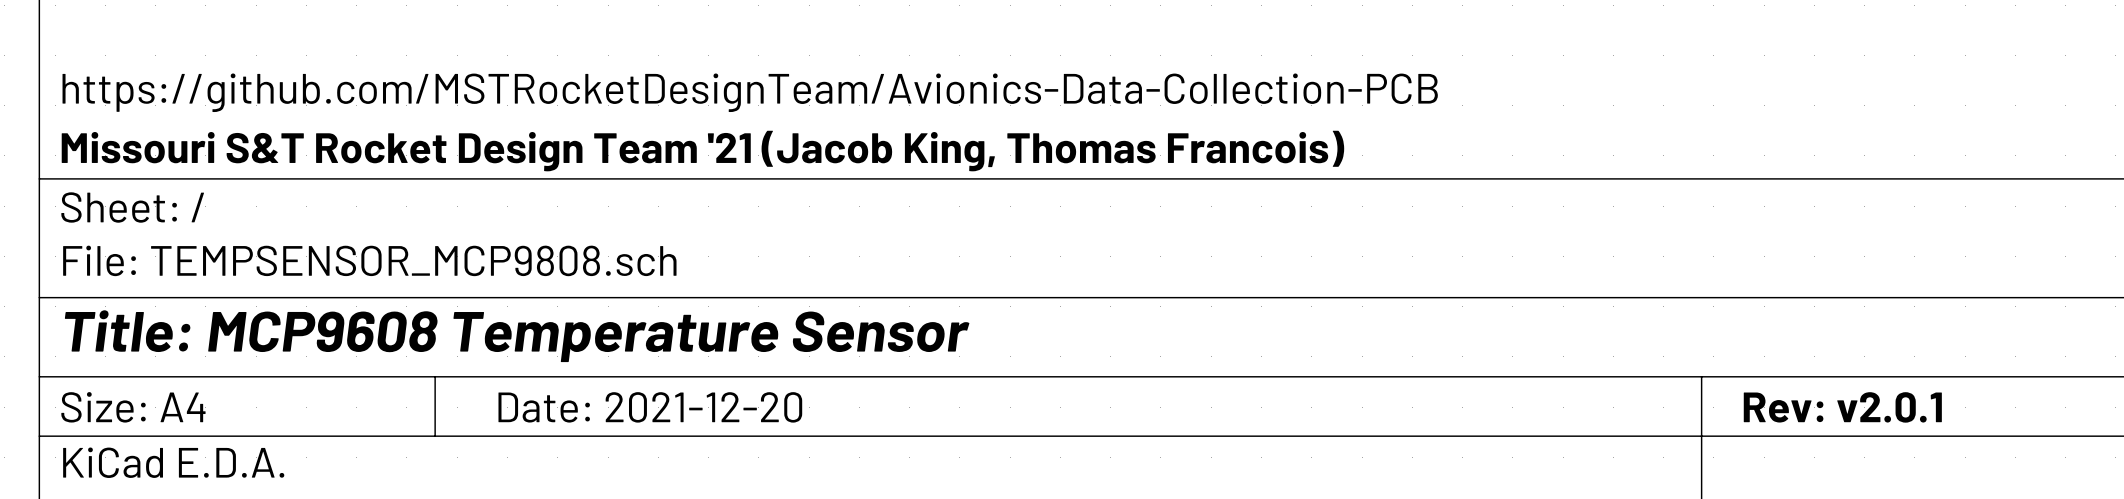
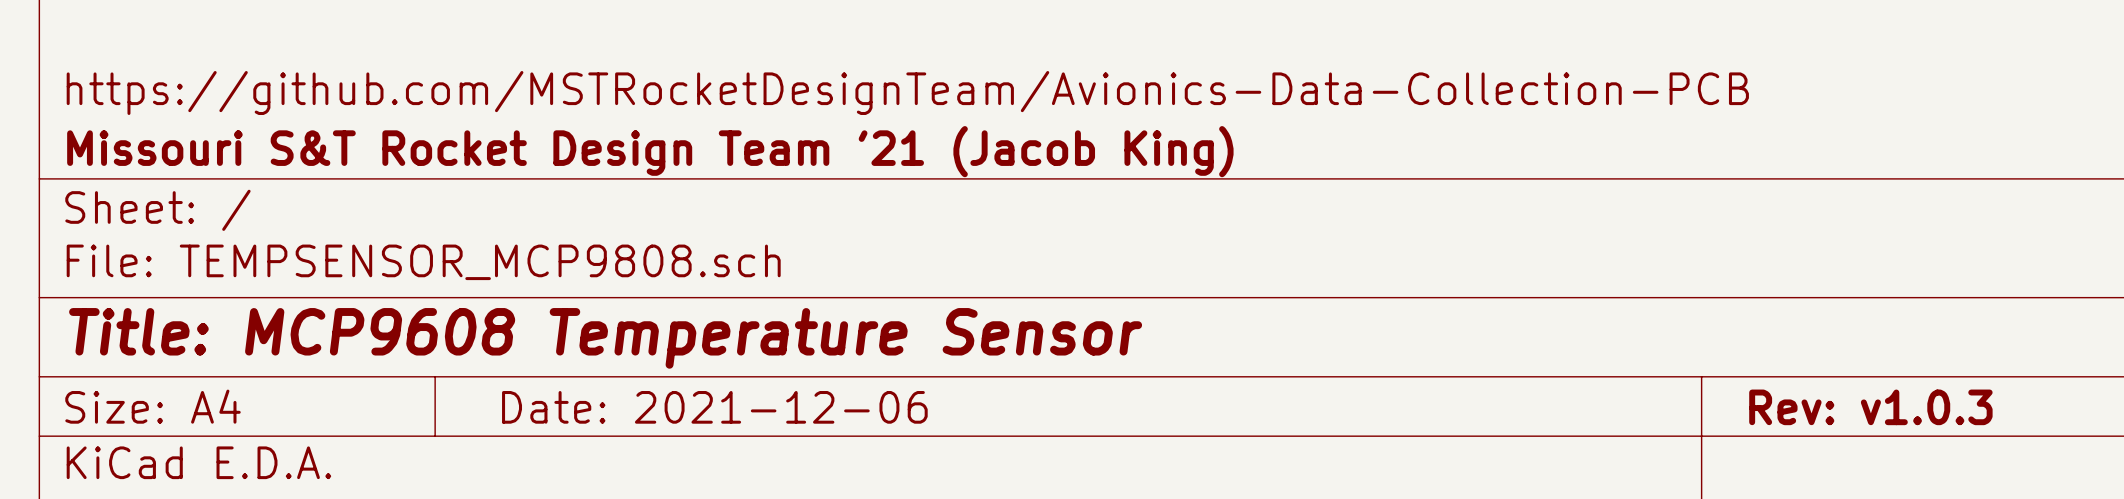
title block: Missouri S&T Rocket Design Team '21 (Jacob King, Thomas Francois) (702, 151) -> Missouri S&T Rocket Design Team '21 (Jacob King) (650, 151)
title block: Date: 2021-12-20 (650, 407) -> Date: 2021-12-06 (714, 407)
title block: Rev: v2.0.1 (1842, 407) -> Rev: v1.0.3 (1870, 407)

